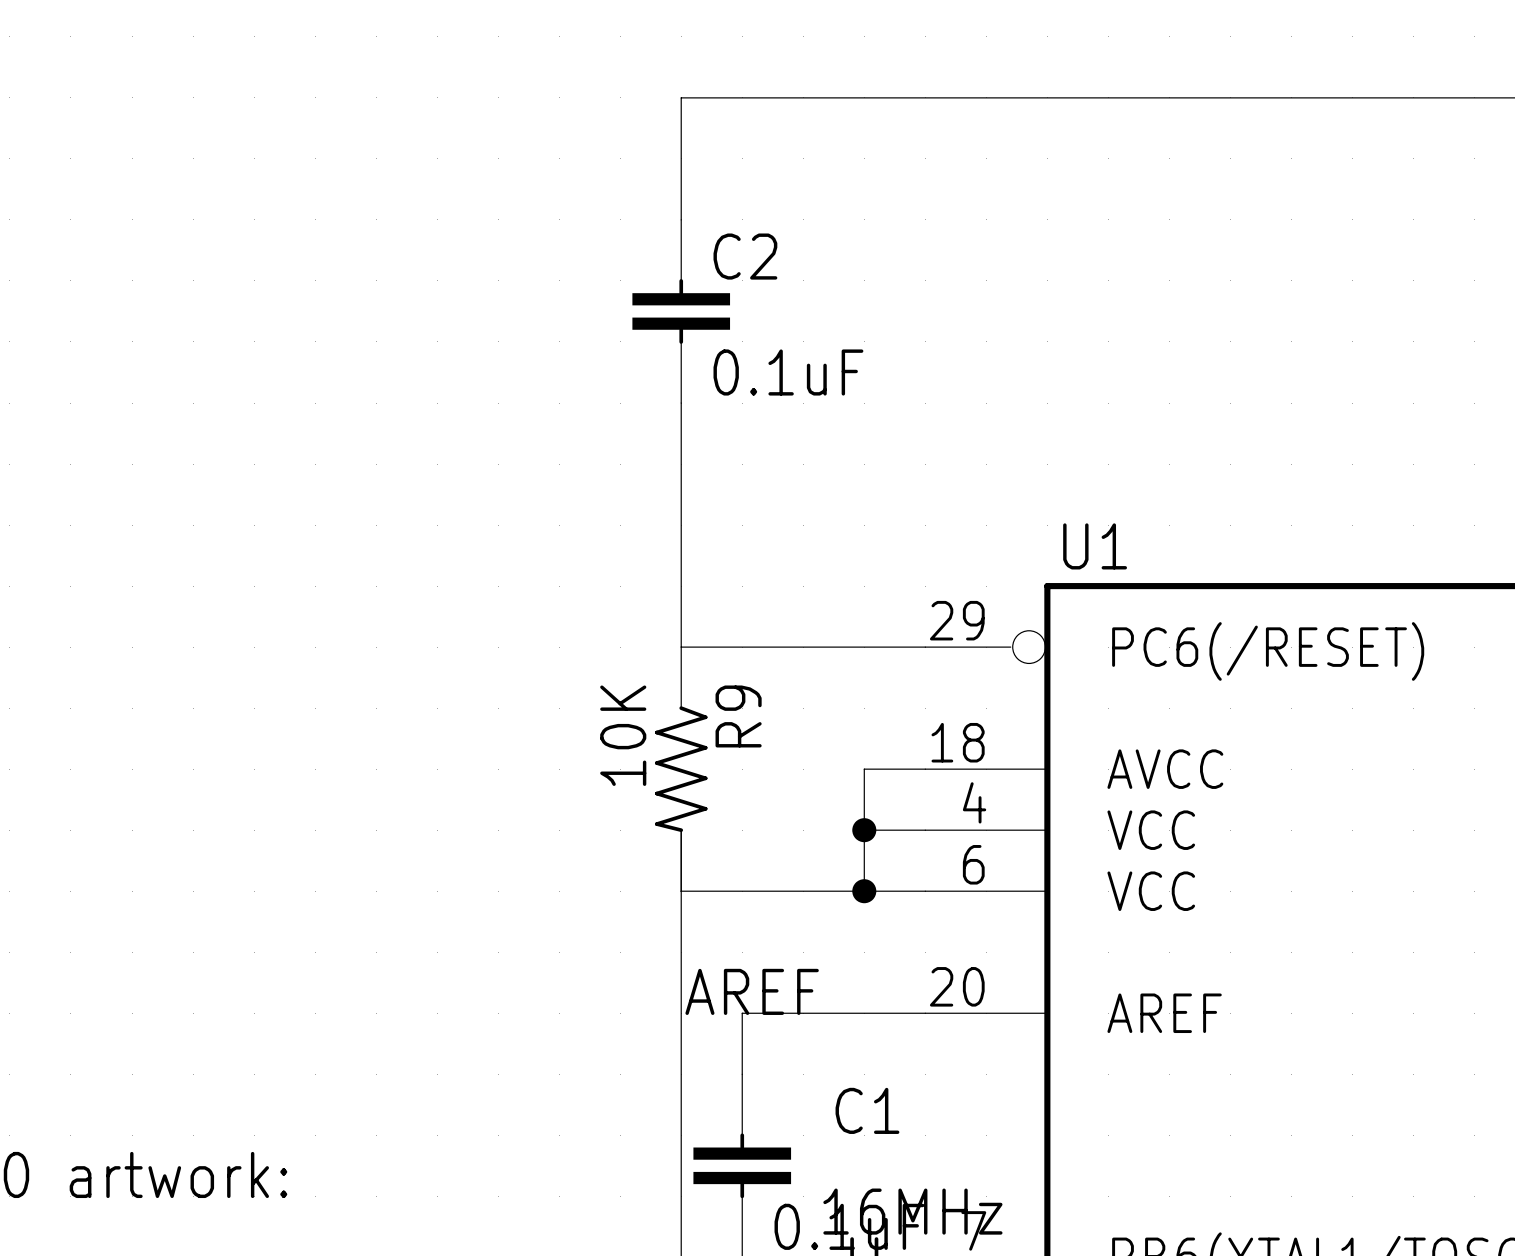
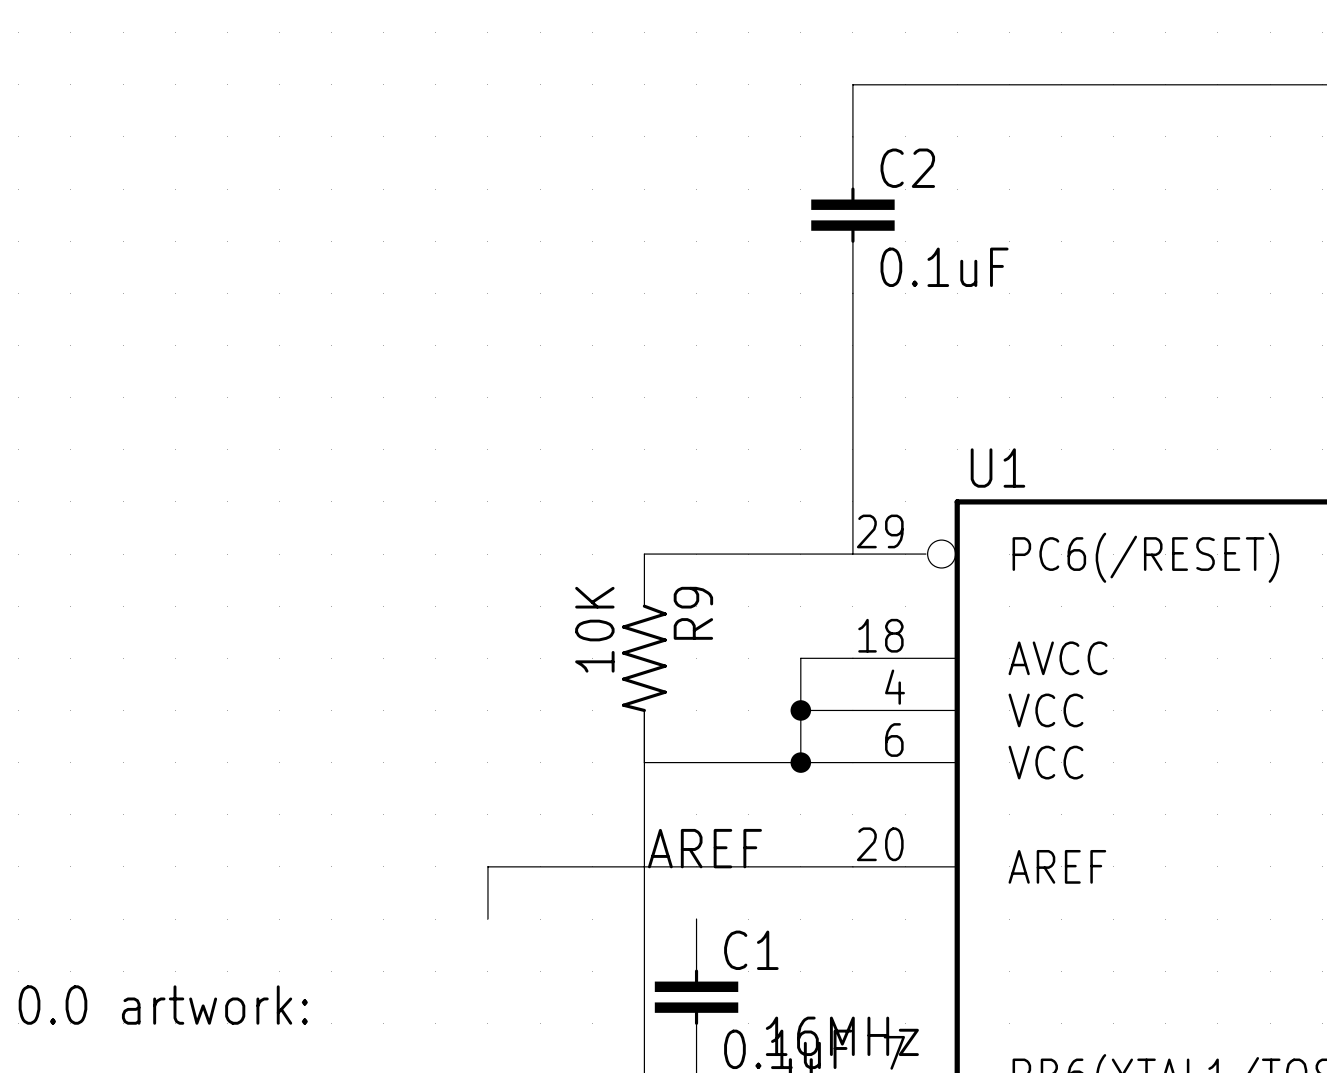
wire: (925, 97) (681, 97) (681, 219) -> (852, 84) (852, 136)
C2 position: (681, 311) -> (852, 215)
wire: none -> (852, 293) (852, 554)
wire: (681, 403) (681, 647) -> none
wire: (742, 1013) (742, 1074) -> (696, 866) (487, 866) (487, 919)
C1 name position: C1 (867, 1110) -> C1 (751, 950)

